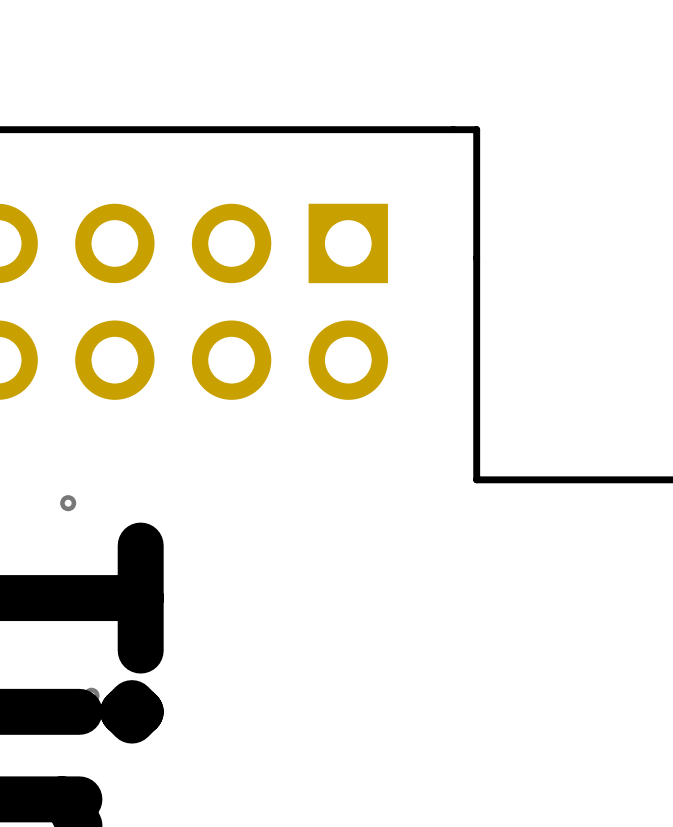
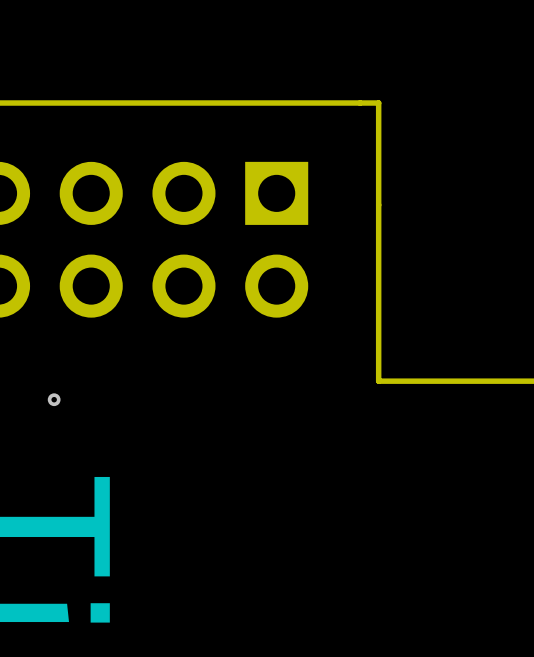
via: (91, 695) -> none

